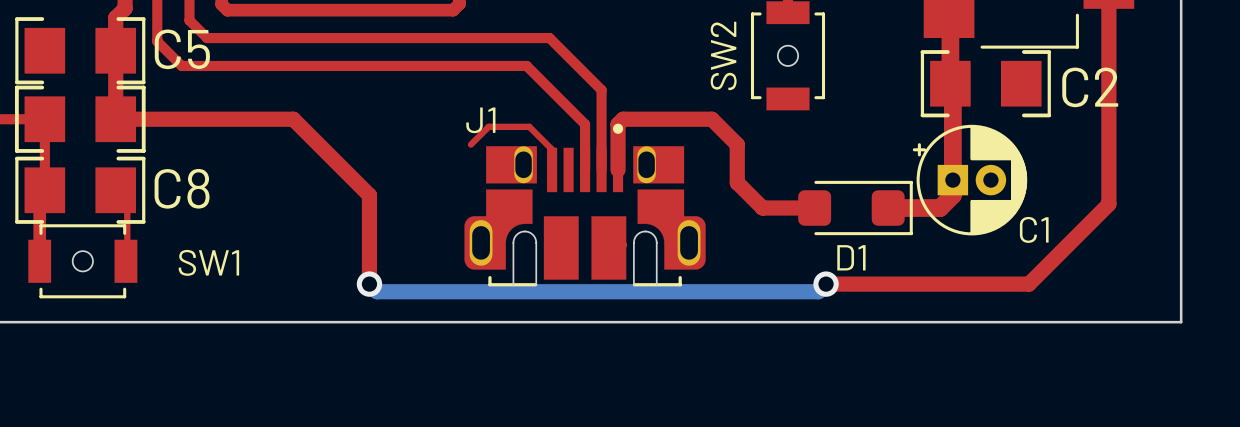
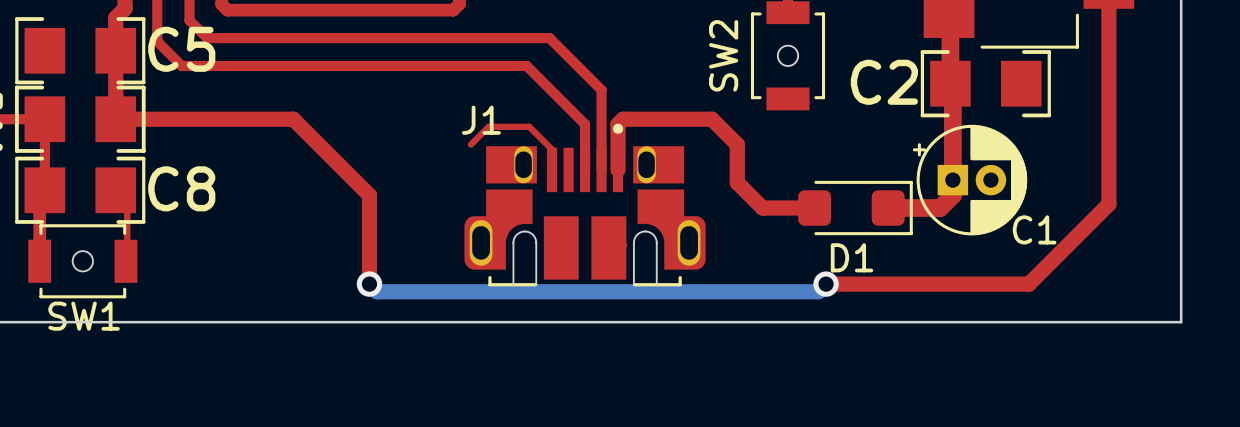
C2 name position: C2 (1090, 87) -> C2 (884, 82)
SW1 name position: SW1 (208, 262) -> SW1 (84, 316)

